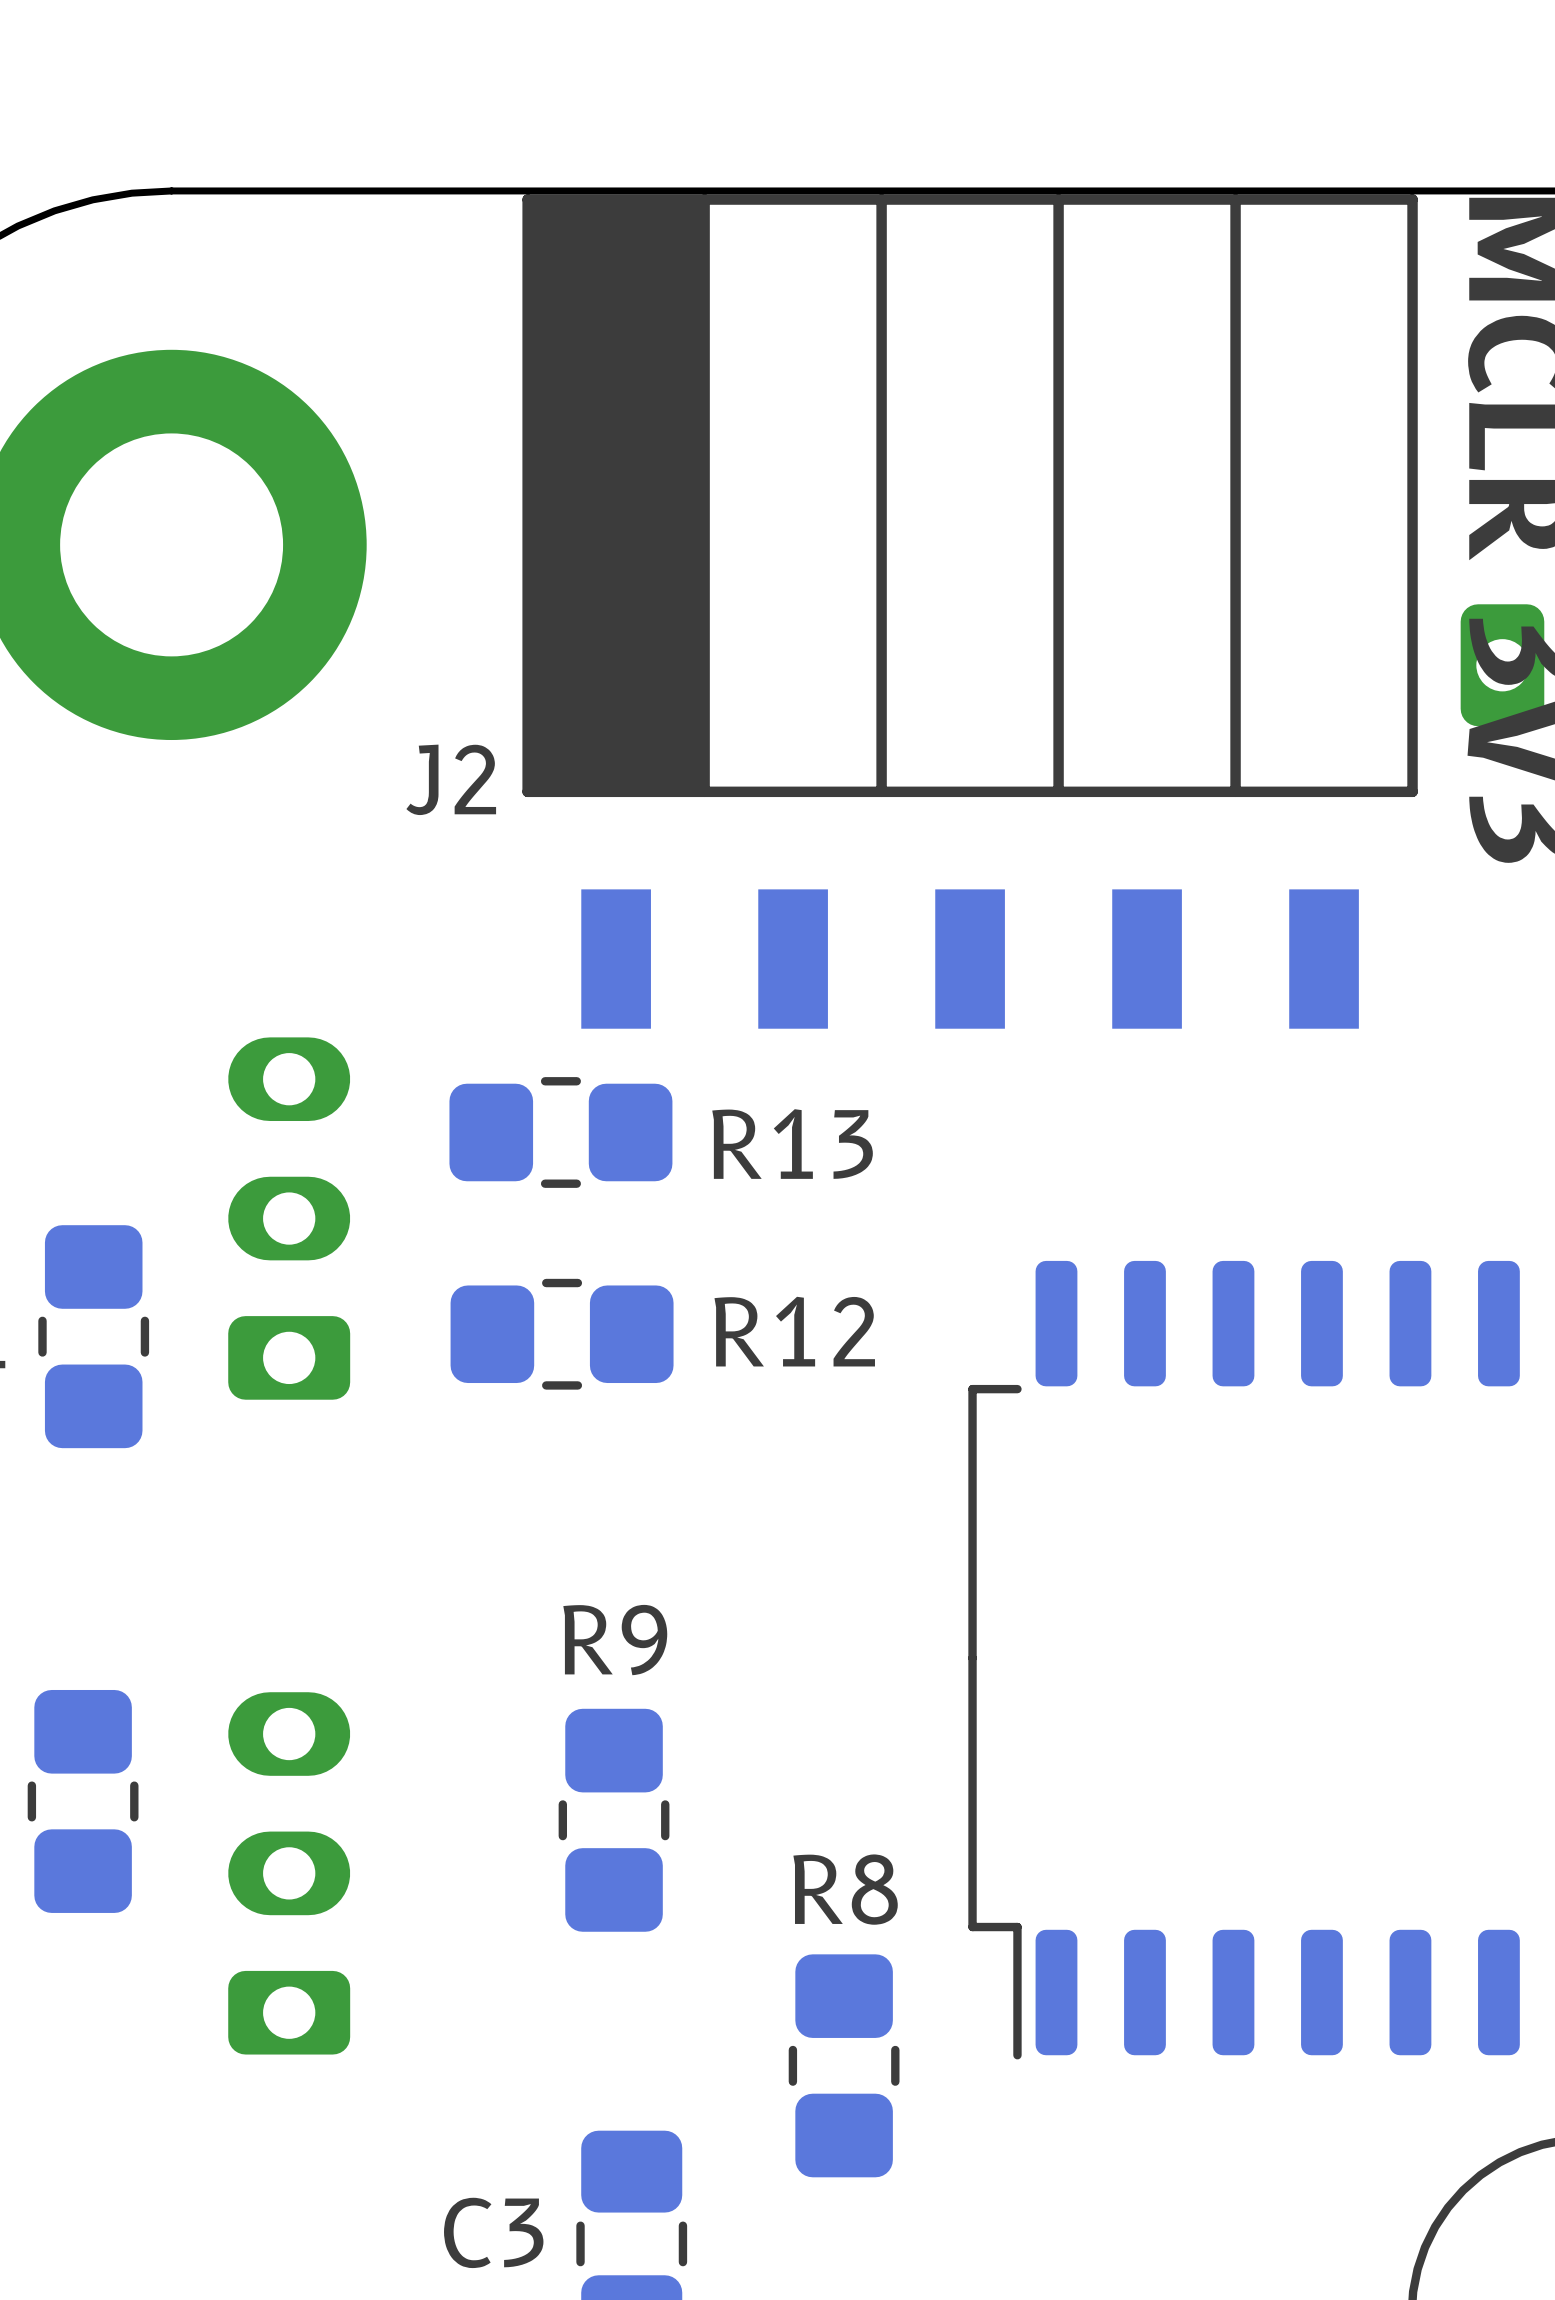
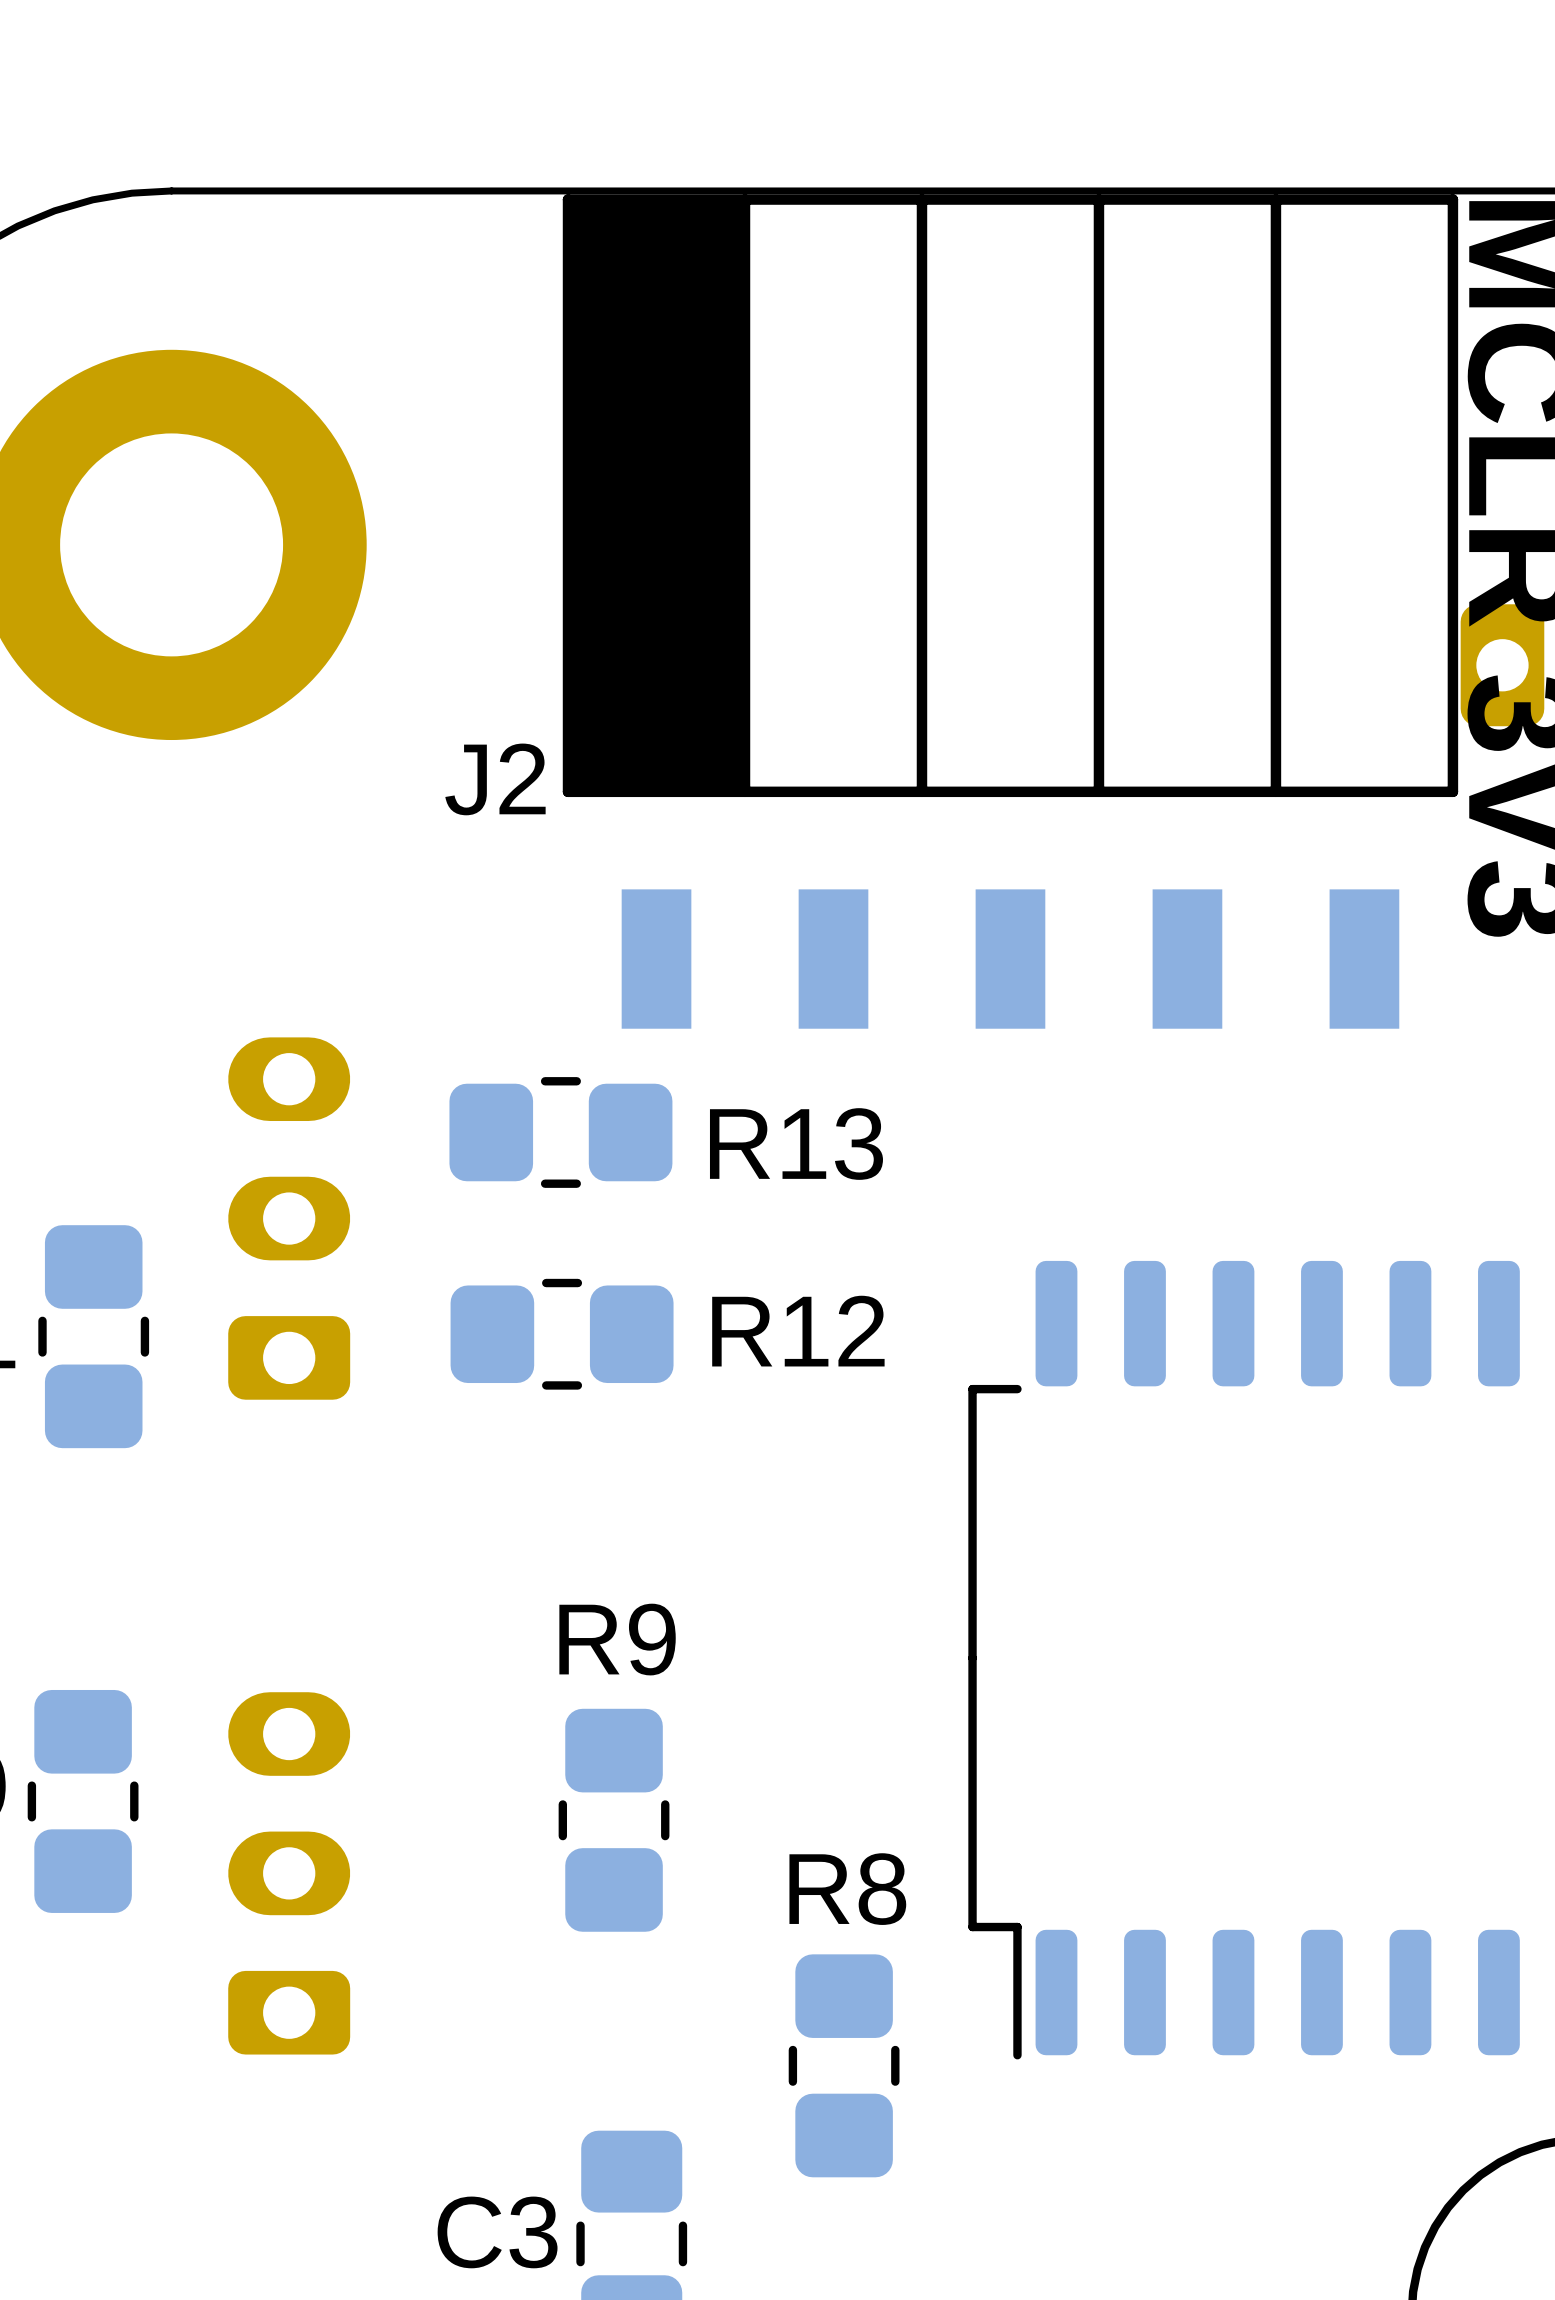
J2 position: (970, 611) -> (1010, 611)

